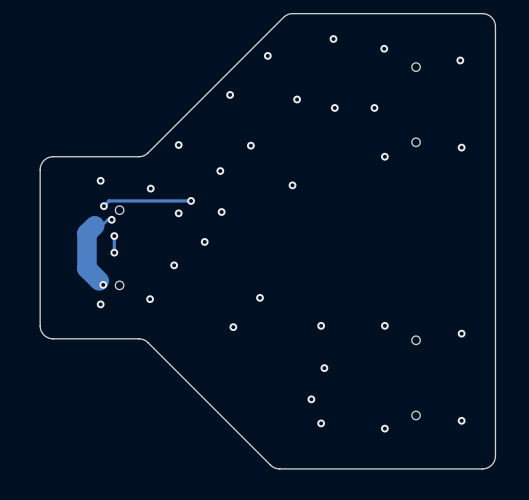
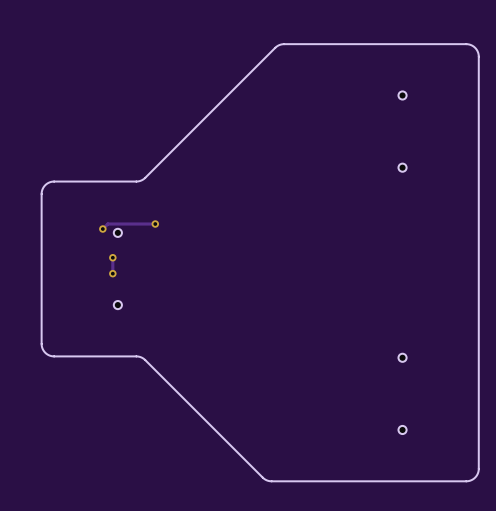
via: (333, 39) -> none
via: (384, 48) -> none
via: (267, 55) -> none
via: (460, 60) -> none
via: (230, 94) -> none
via: (297, 99) -> none
via: (334, 107) -> none
via: (374, 107) -> none
via: (178, 145) -> none
via: (250, 145) -> none
via: (461, 147) -> none
via: (384, 156) -> none
via: (220, 171) -> none
via: (100, 180) -> none
via: (292, 185) -> none
via: (150, 188) -> none
via: none -> (155, 224)
track: (191, 200) (158, 200) -> none
via: (191, 200) -> none
via: (221, 212) -> none
via: (178, 213) -> none
track: (111, 219) (107, 219) (100, 226) -> none
via: (111, 219) -> none
track: (94, 225) (86, 233) (86, 268) (103, 284) -> none
via: (204, 241) -> none
via: (174, 265) -> none
via: (103, 284) -> none
via: (260, 297) -> none
via: (150, 299) -> none
via: (100, 304) -> none
via: (321, 325) -> none
via: (384, 325) -> none
via: (233, 327) -> none
via: (461, 333) -> none
via: (324, 368) -> none
via: (311, 399) -> none
via: (461, 420) -> none
via: (321, 423) -> none
via: (384, 428) -> none

